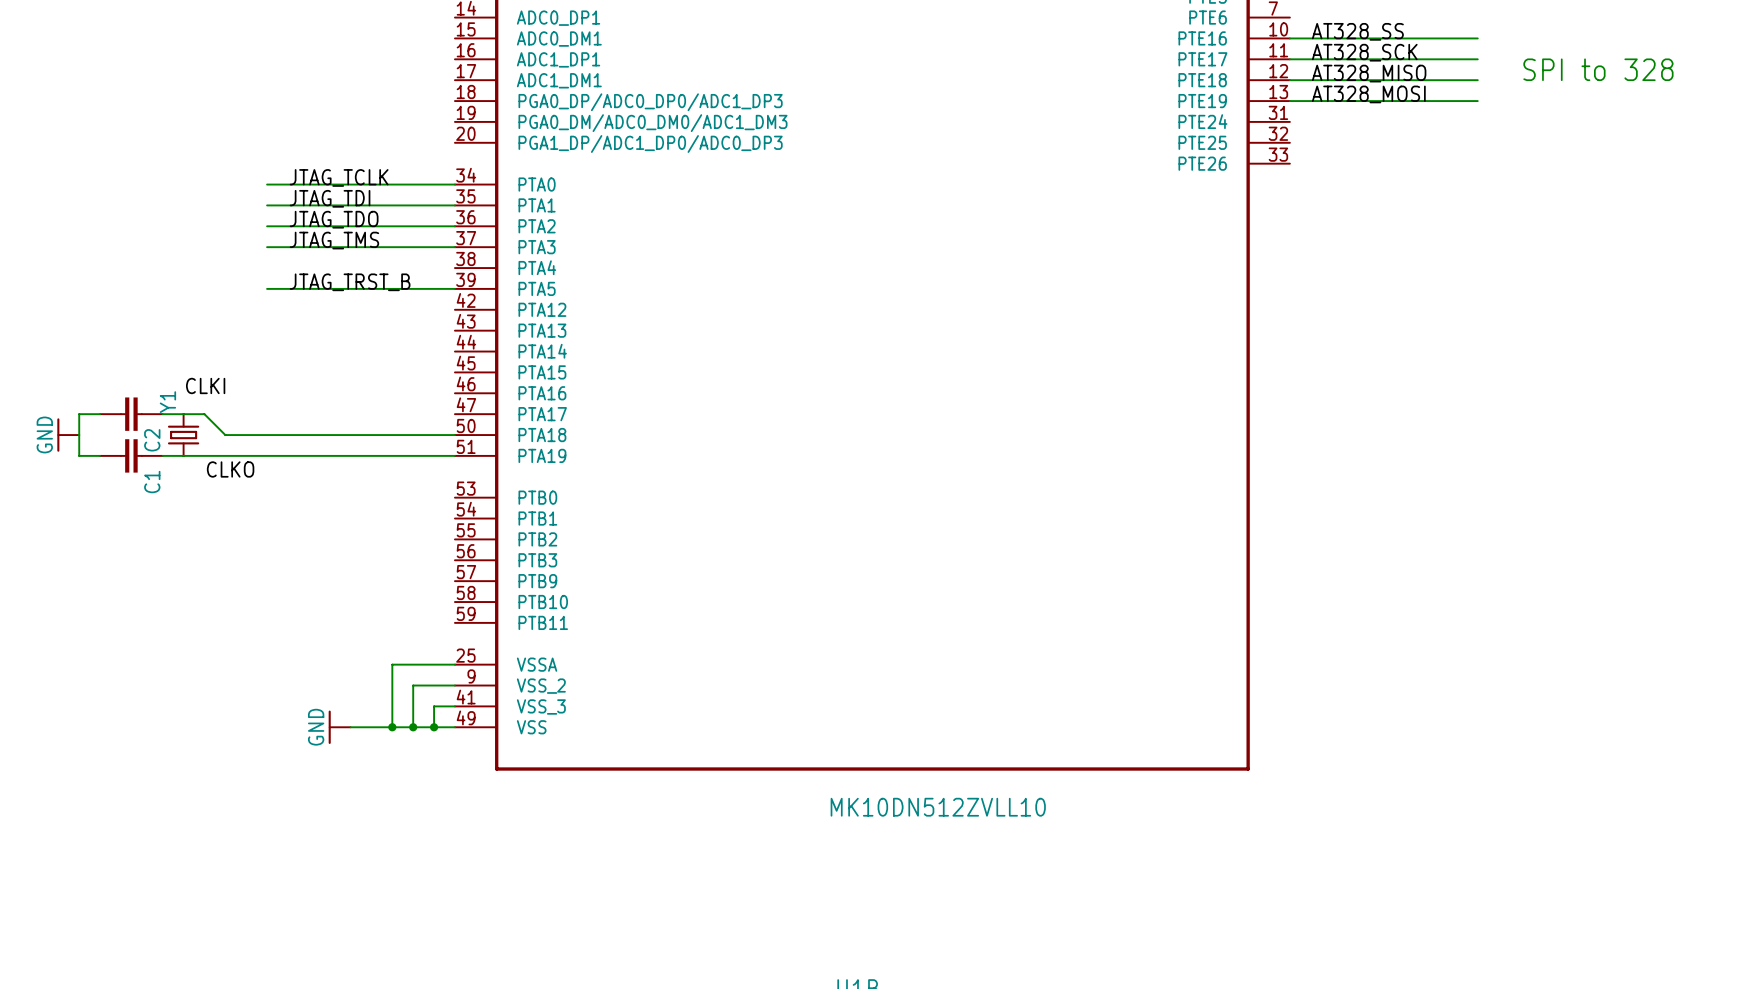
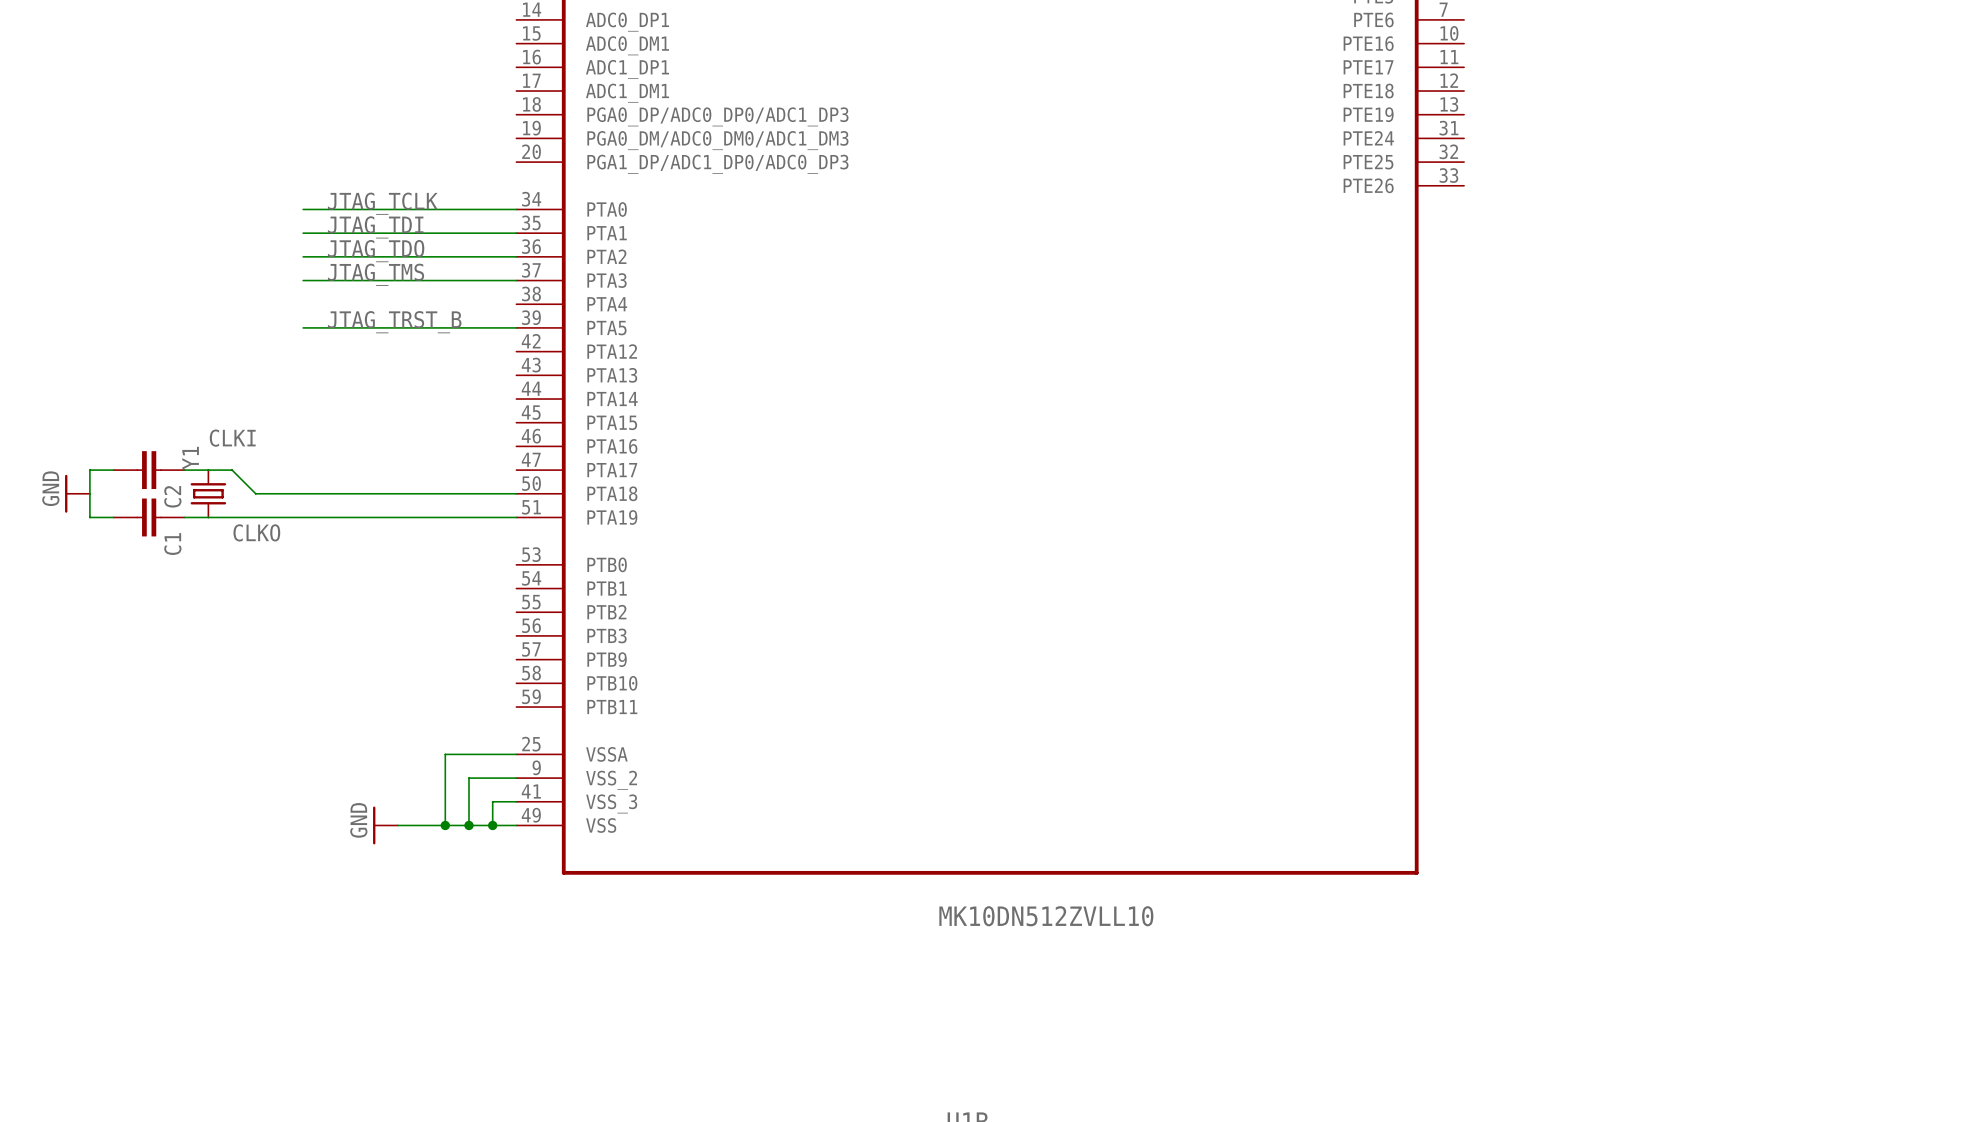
label: AT328_SS (1357, 31) -> none
wire: (1289, 38) (1477, 38) -> none
label: AT328_SCK (1364, 52) -> none
wire: (1289, 59) (1477, 59) -> none
text: SPI to 328 (1598, 69) -> none
label: AT328_MISO (1369, 73) -> none
wire: (1289, 80) (1477, 80) -> none
label: AT328_MOSI (1368, 94) -> none
wire: (1289, 101) (1477, 101) -> none

